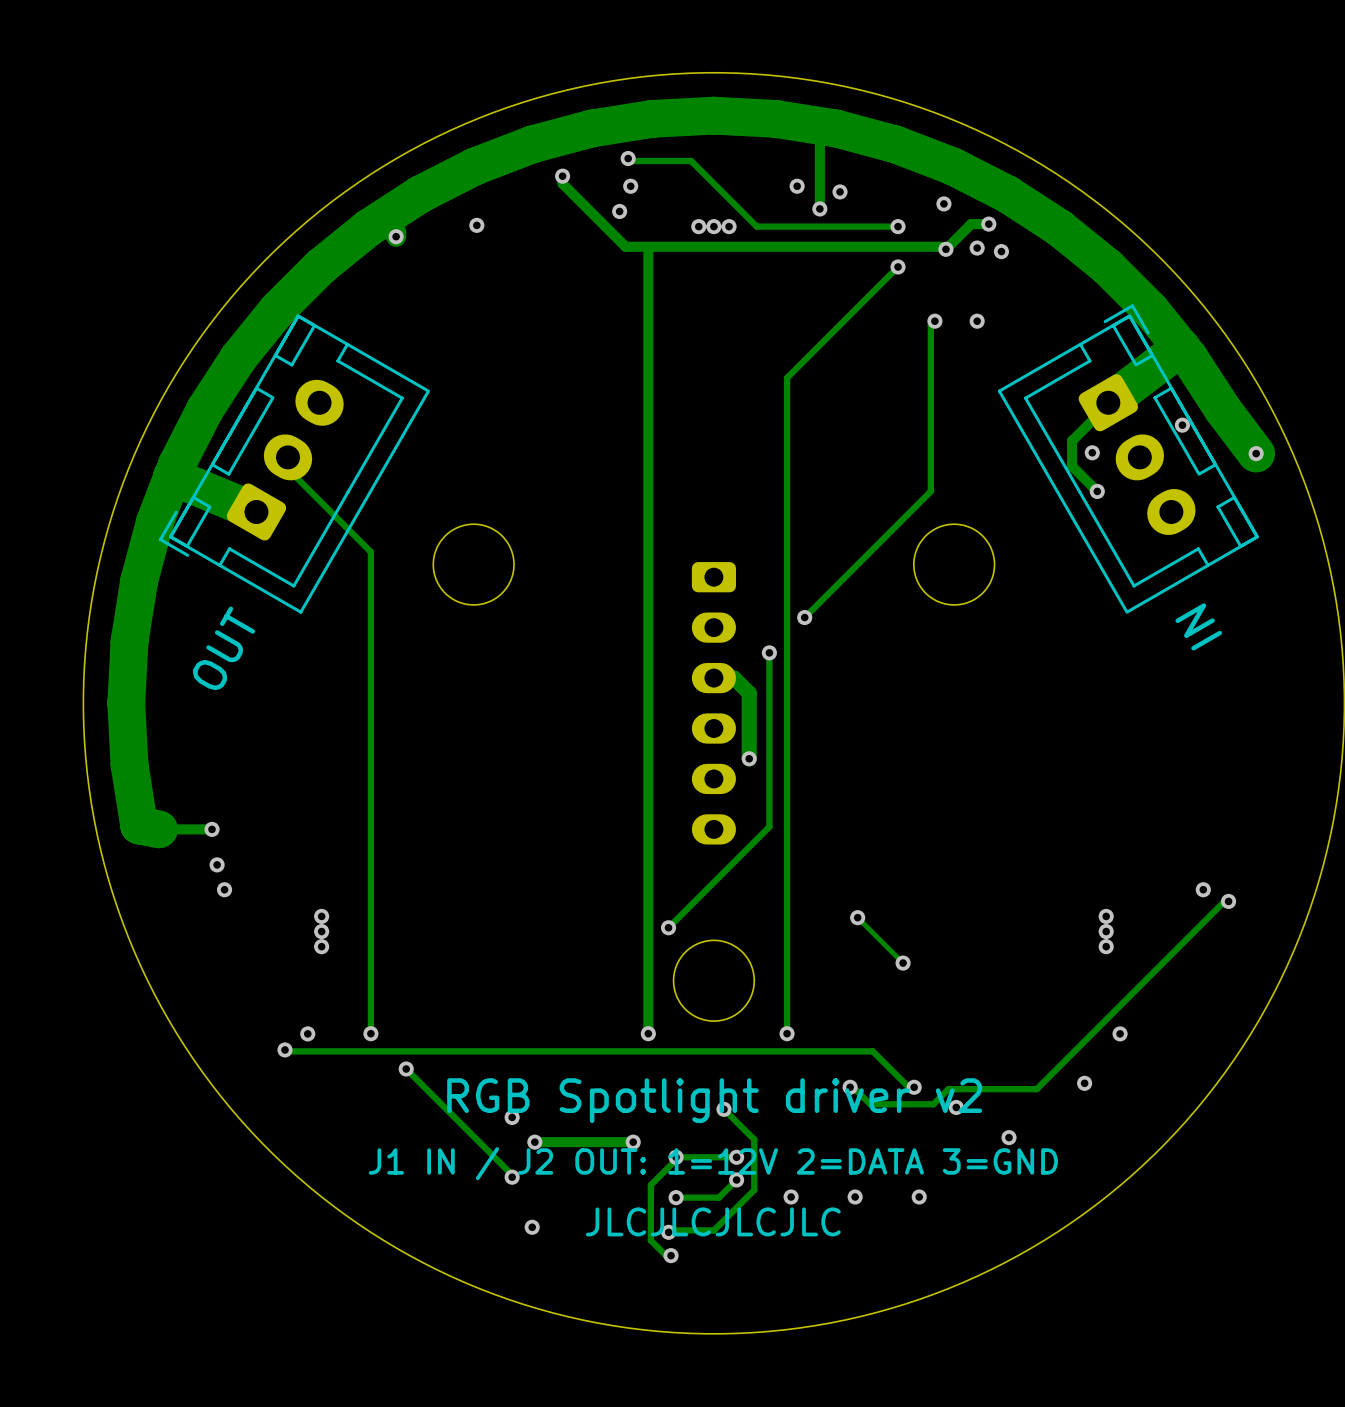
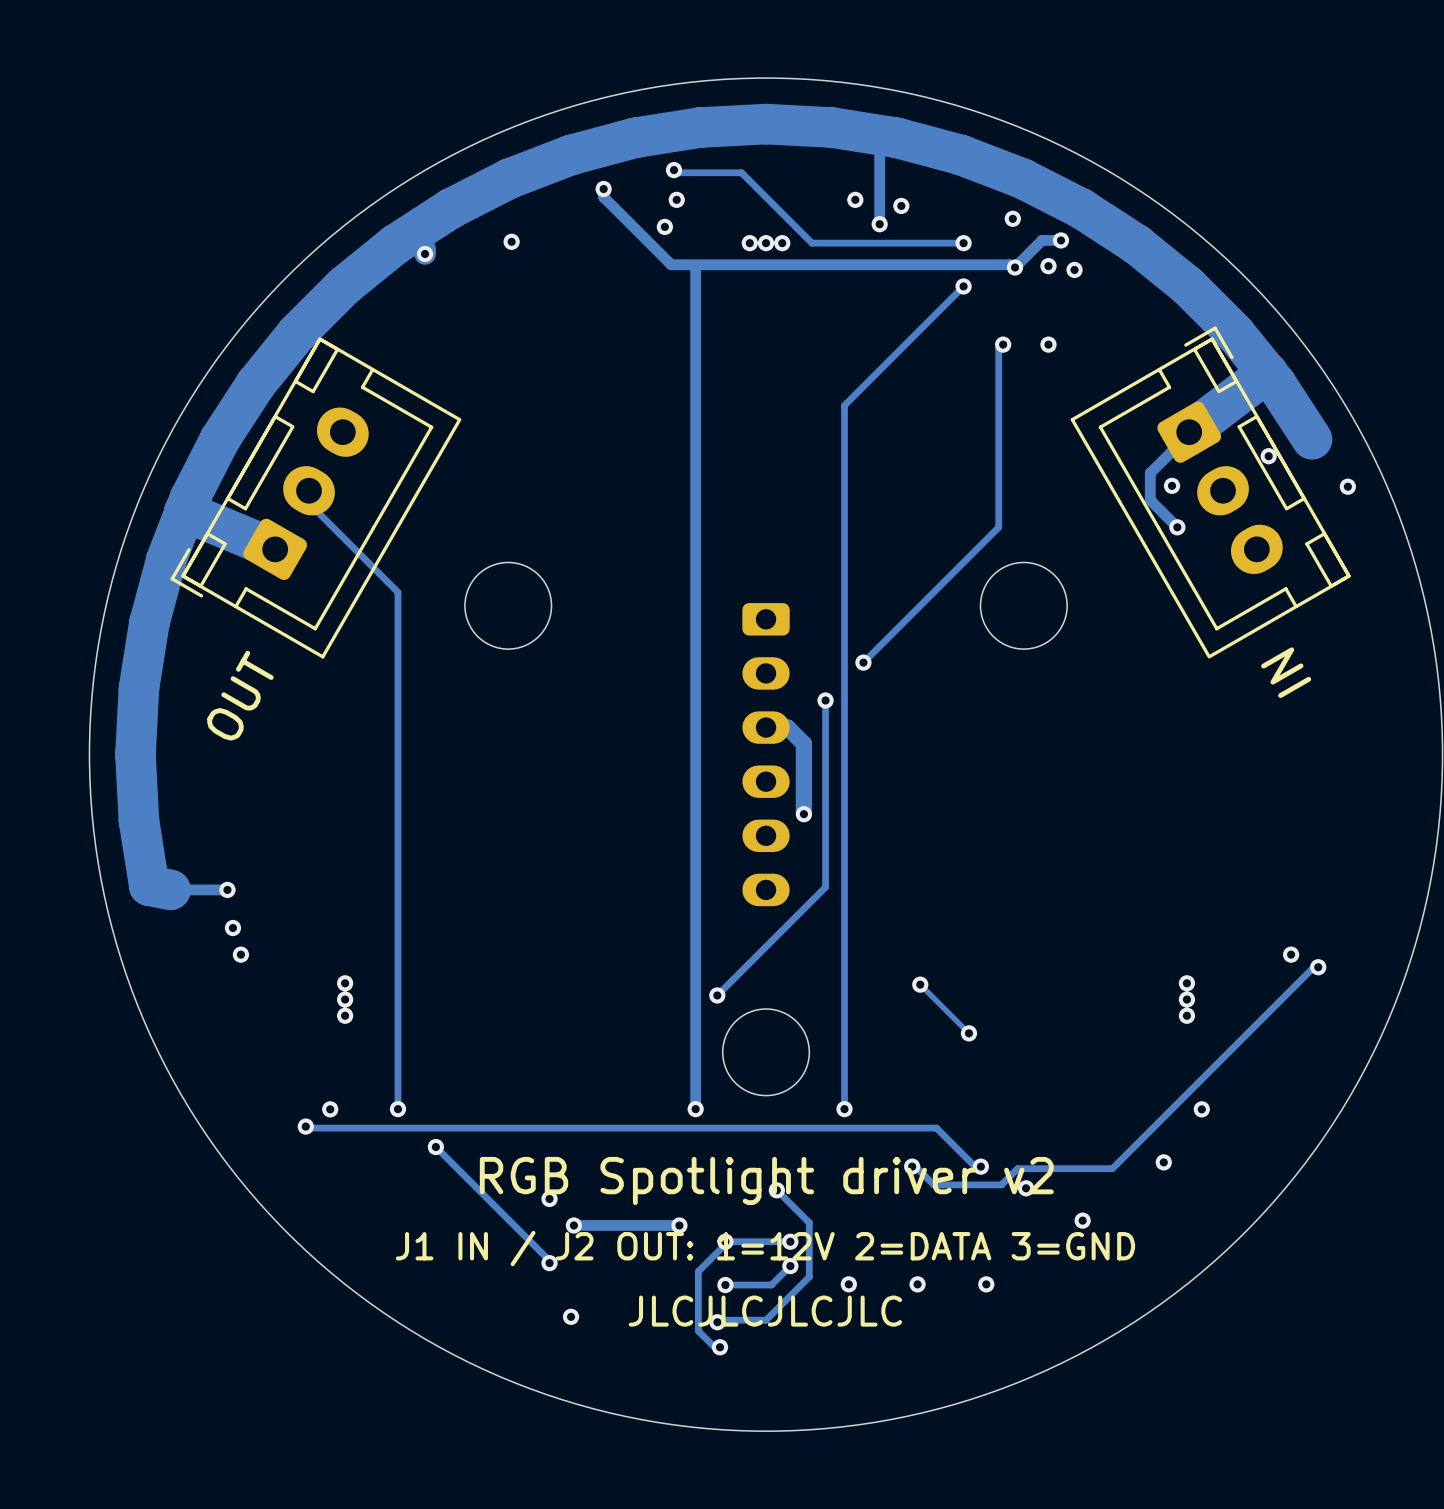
track: (1222, 409) (1256, 453) -> none

